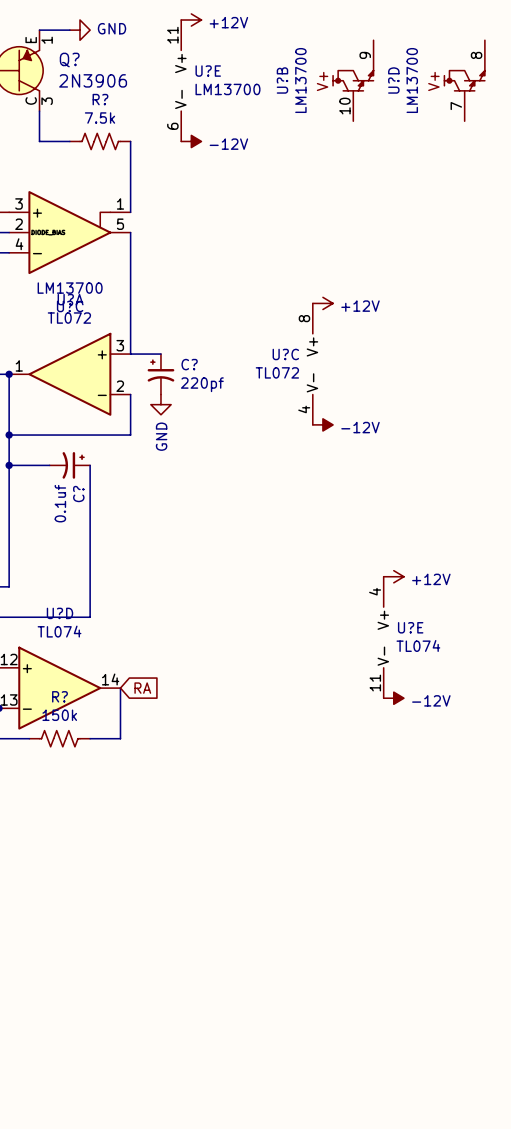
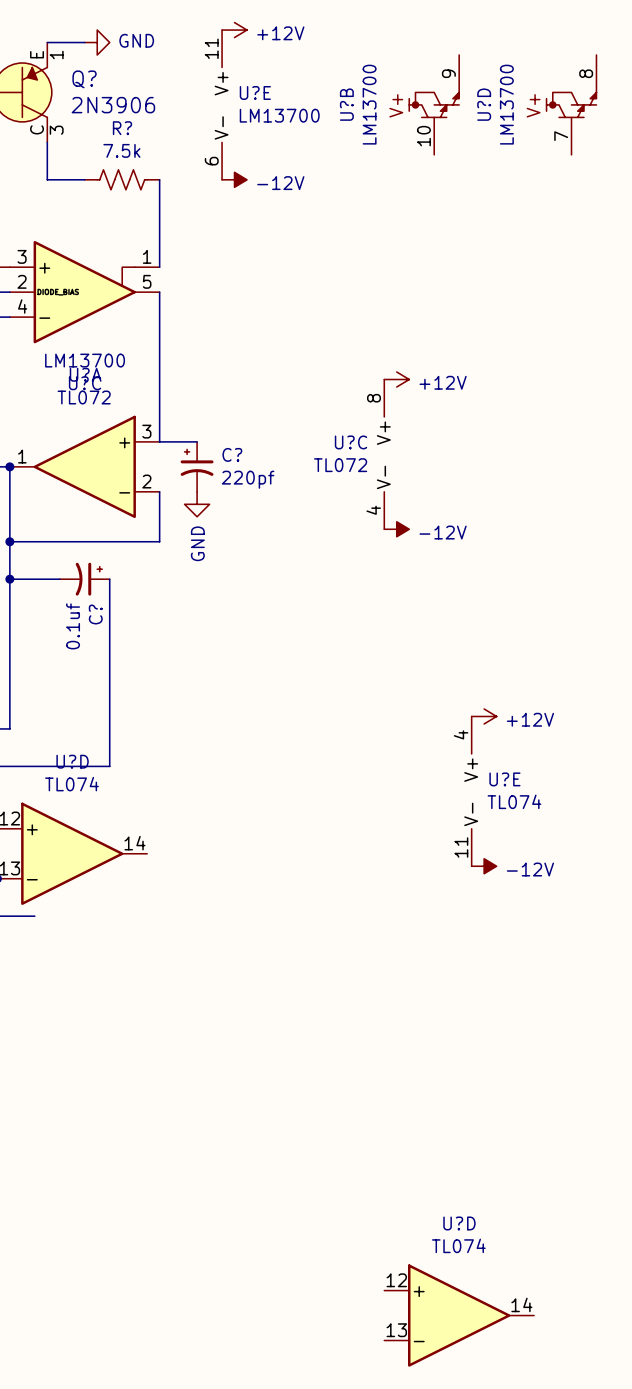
wire: (120, 688) (120, 738) (90, 738) -> none
global label: RA (142, 688) -> none
R?: 150k (59, 738) -> none
U?D: none -> TL074 (459, 1315)

